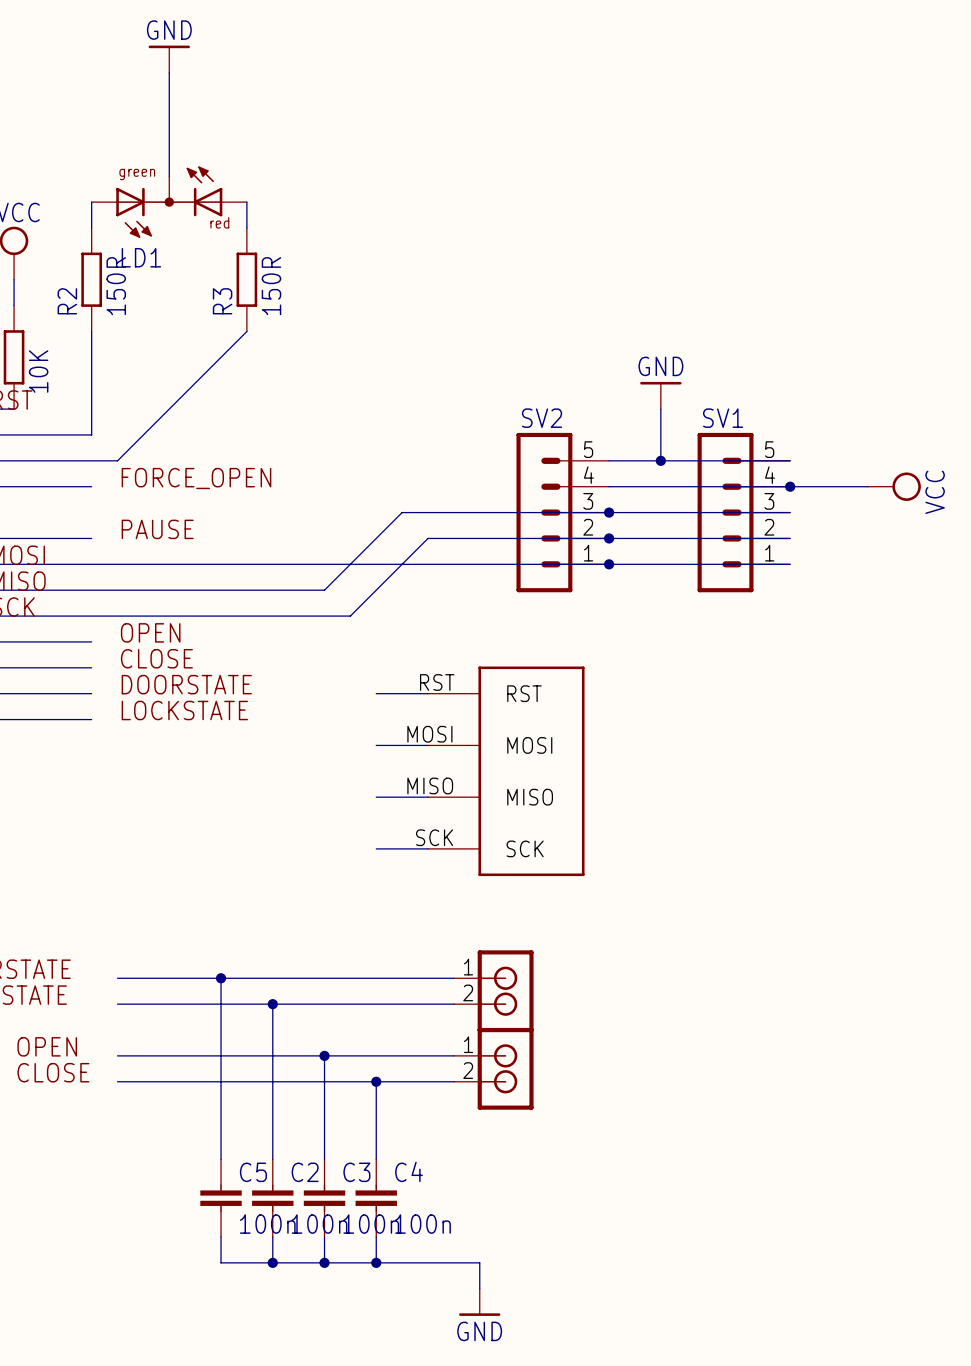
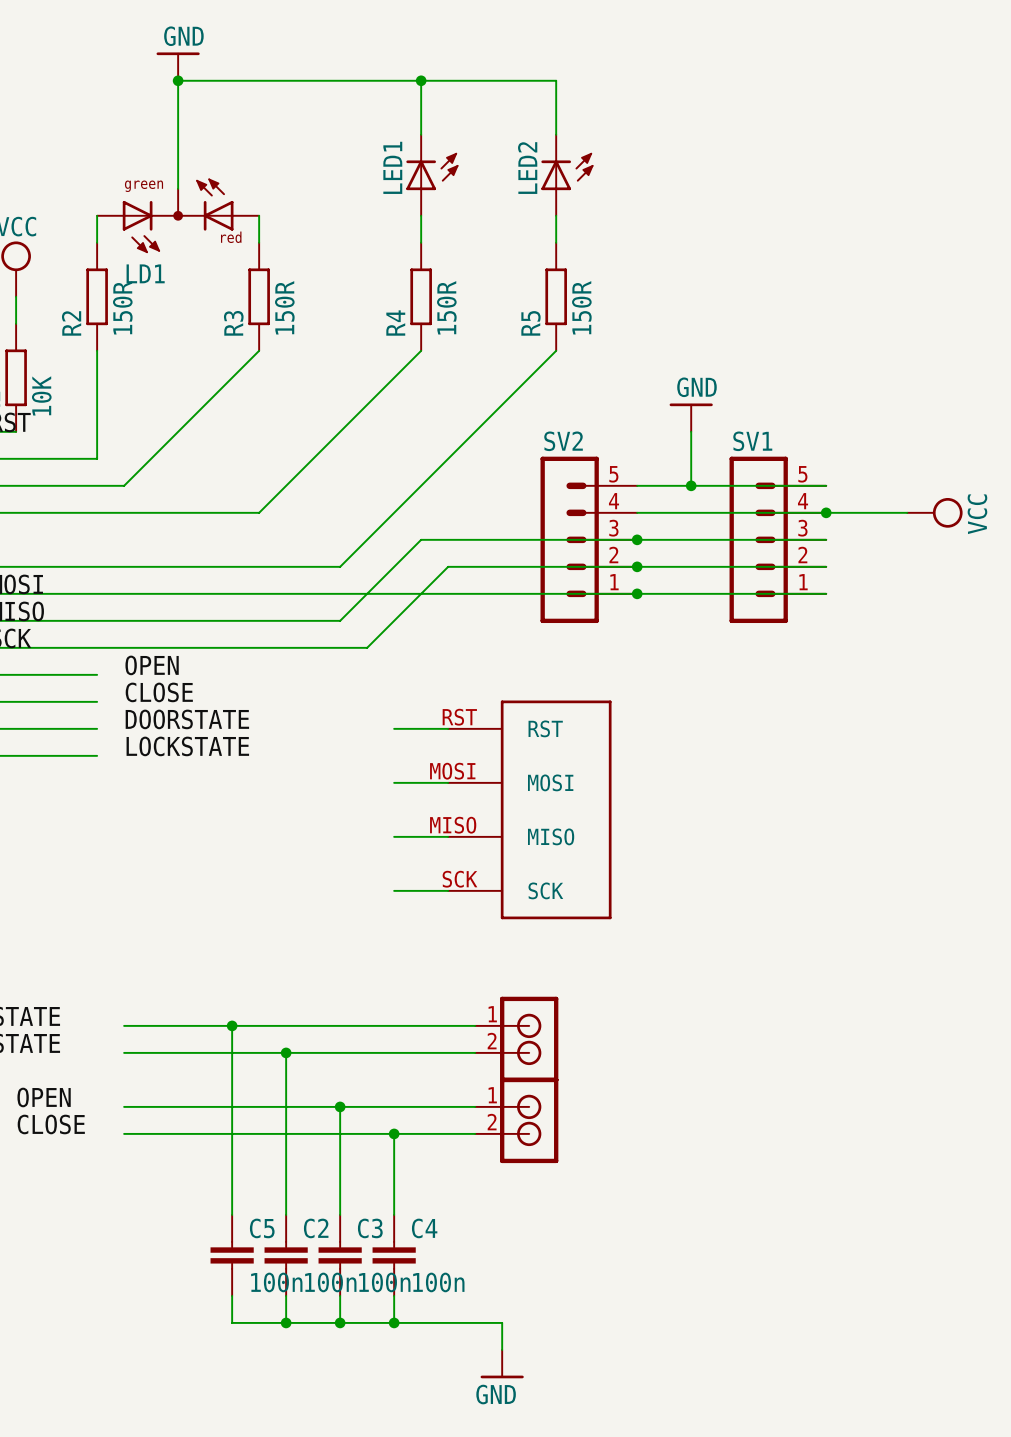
wire: none -> (178, 80) (556, 80) (556, 134)
junction: none -> (178, 80)
wire: none -> (421, 80) (421, 134)
junction: none -> (421, 80)
LED1: none -> (432, 175)
LED2: none -> (567, 175)
wire: none -> (421, 215) (421, 242)
wire: none -> (556, 215) (556, 242)
R4: none -> 150R (421, 296)
R5: none -> 150R (556, 296)
wire: none -> (421, 350) (259, 512) (97, 512)
wire: none -> (556, 350) (340, 566) (97, 566)
label: FORCE_OPEN (196, 478) -> none
label: PAUSE (157, 529) -> none

